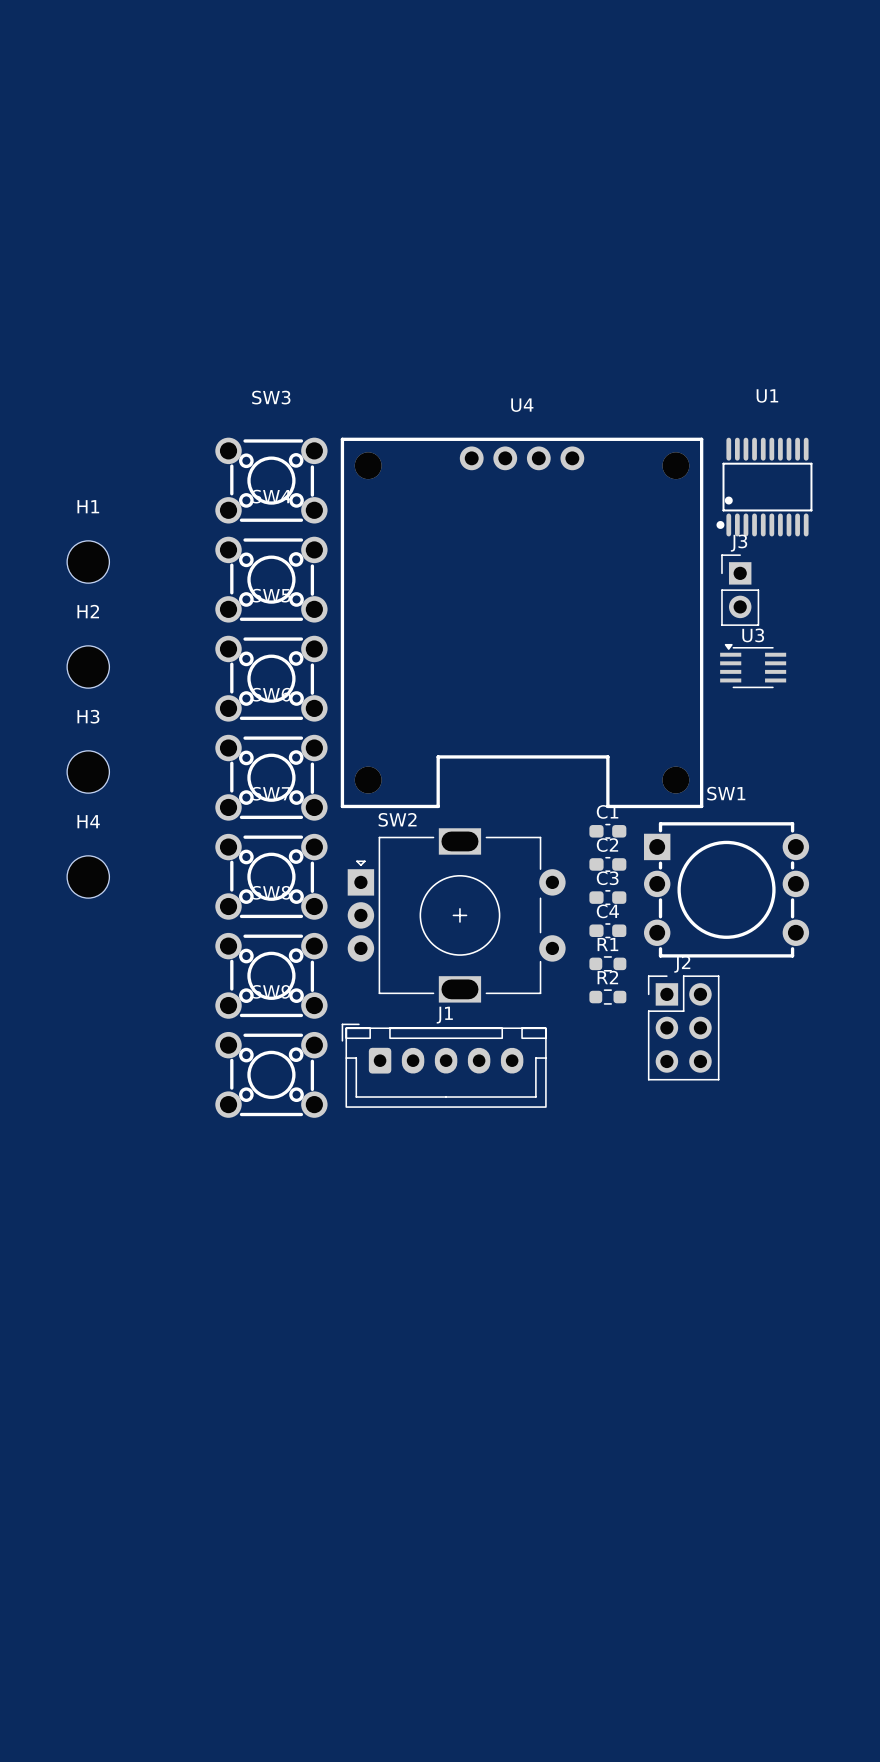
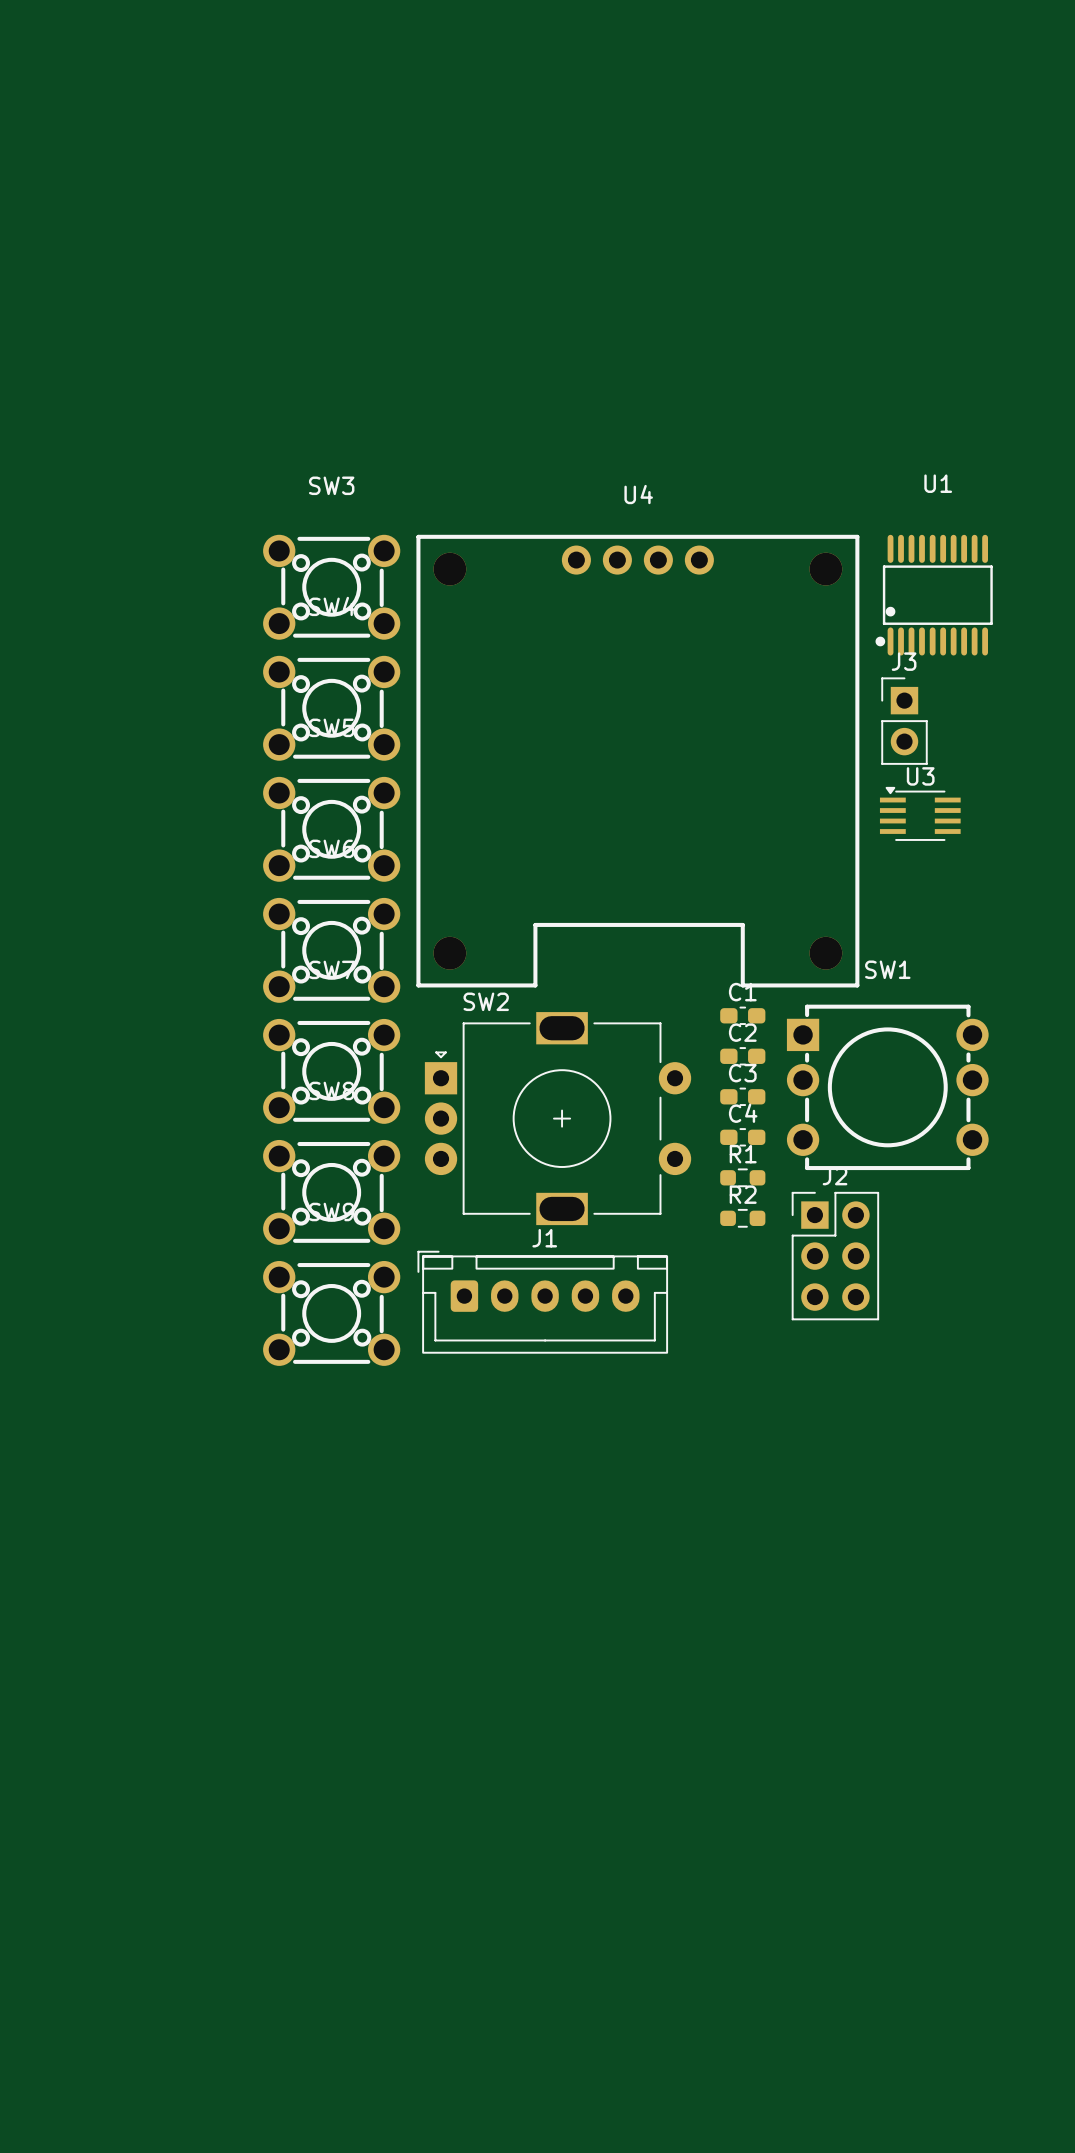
H1: (88, 562) -> none
H2: (88, 667) -> none
H3: (88, 771) -> none
H4: (88, 876) -> none

